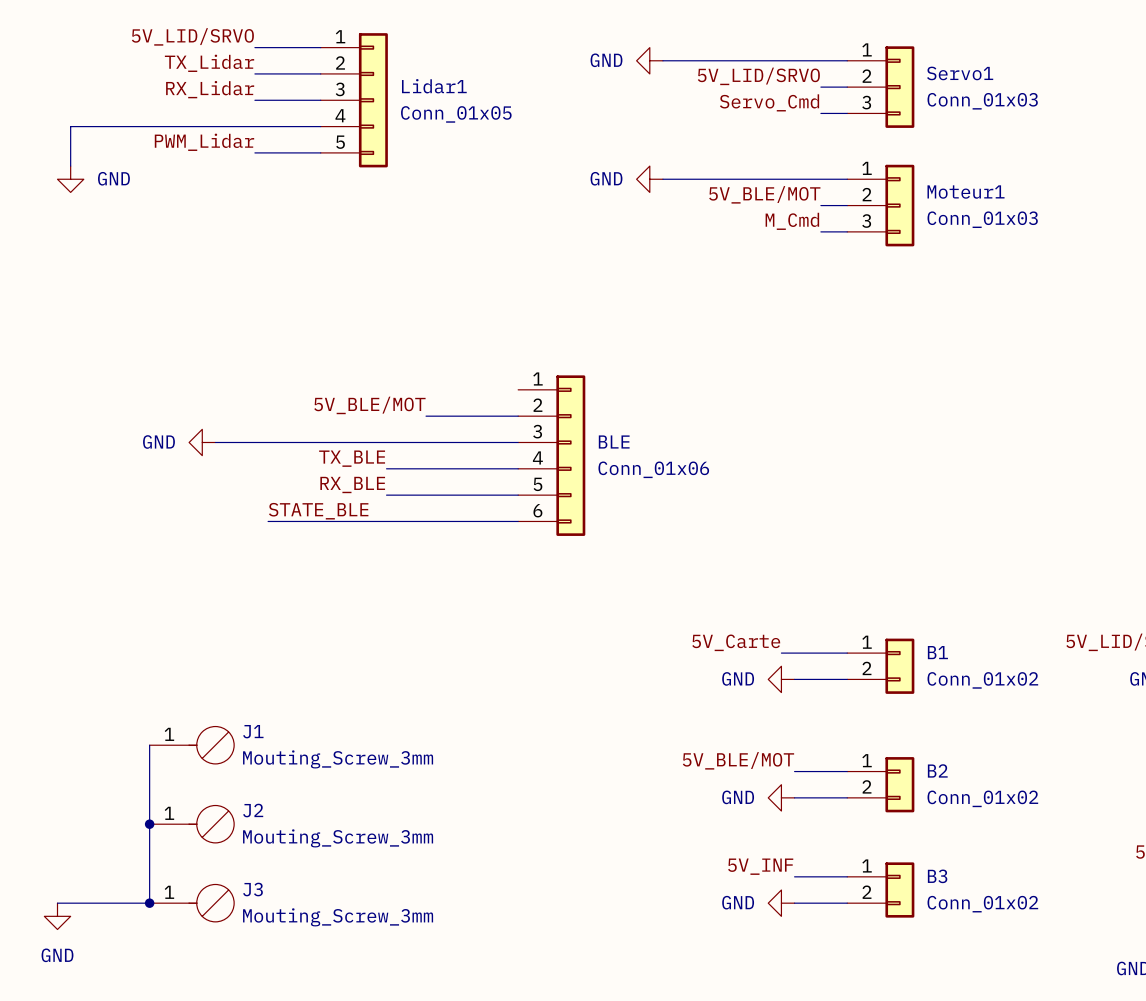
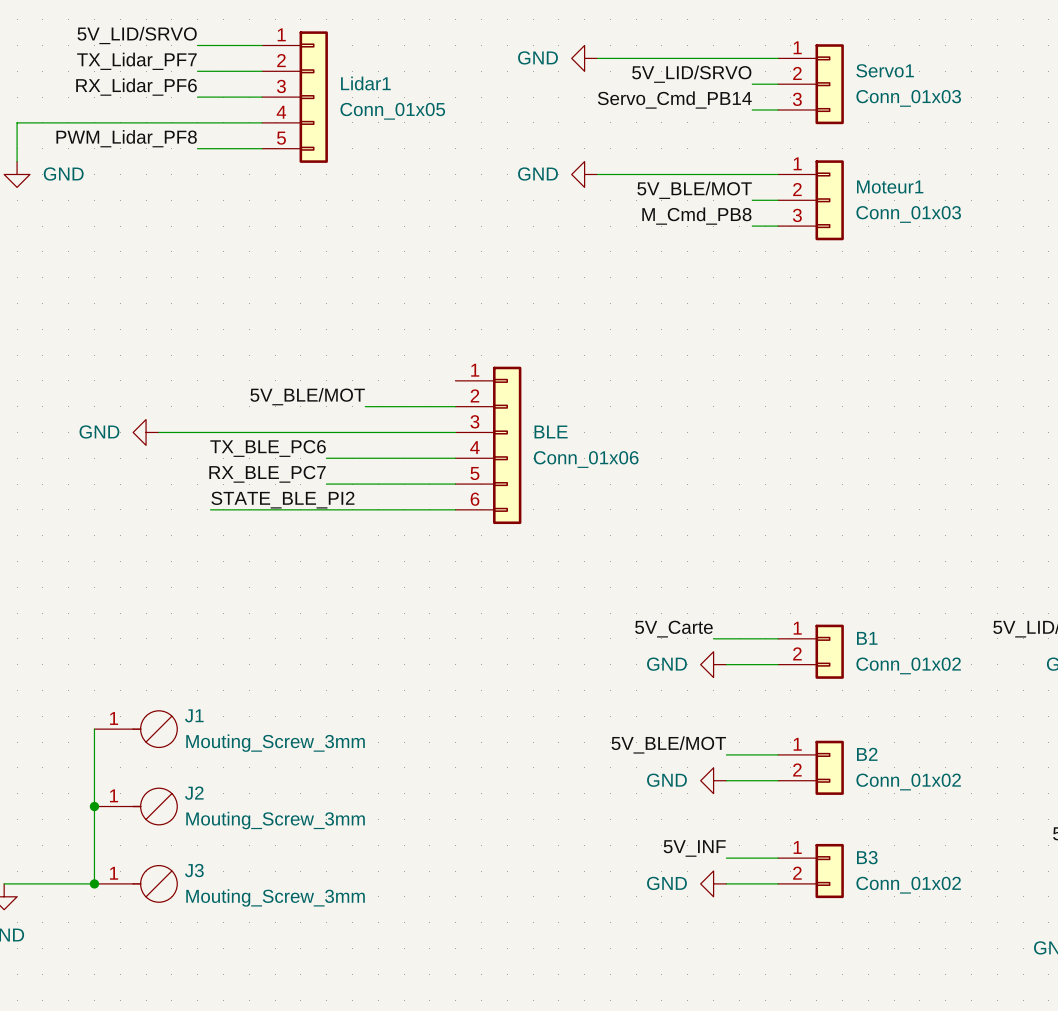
label: TX_Lidar (209, 63) -> TX_Lidar_PF7 (136, 61)
label: RX_Lidar (210, 89) -> RX_Lidar_PF6 (136, 87)
label: Servo_Cmd (769, 102) -> Servo_Cmd_PB14 (674, 100)
label: PWM_Lidar (204, 142) -> PWM_Lidar_PF8 (126, 138)
label: M_Cmd (792, 221) -> M_Cmd_PB8 (696, 216)
label: TX_BLE (352, 458) -> TX_BLE_PC6 (268, 448)
label: RX_BLE (352, 484) -> RX_BLE_PC7 (267, 474)
label: STATE_BLE (318, 511) -> STATE_BLE_PI2 (282, 500)

